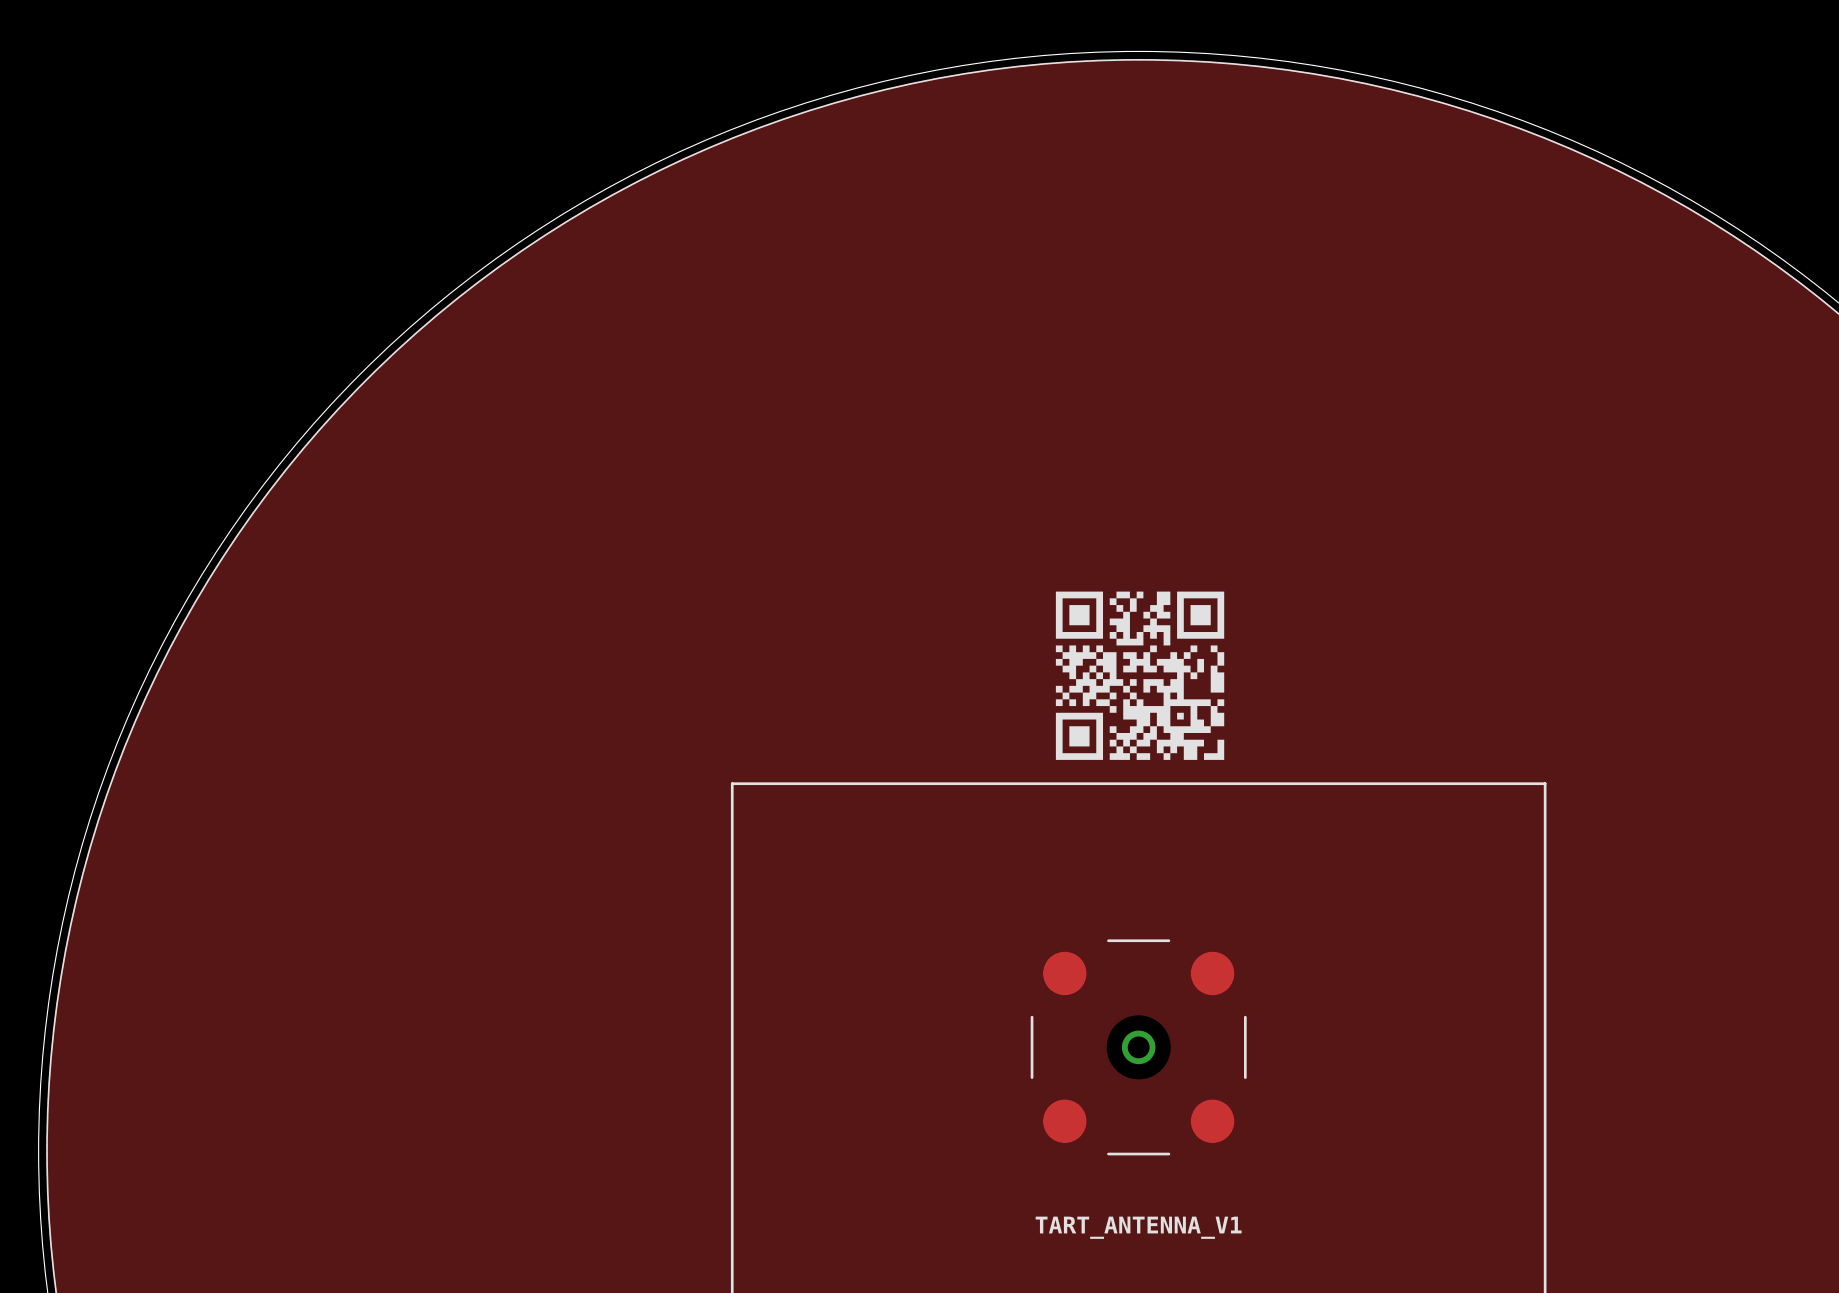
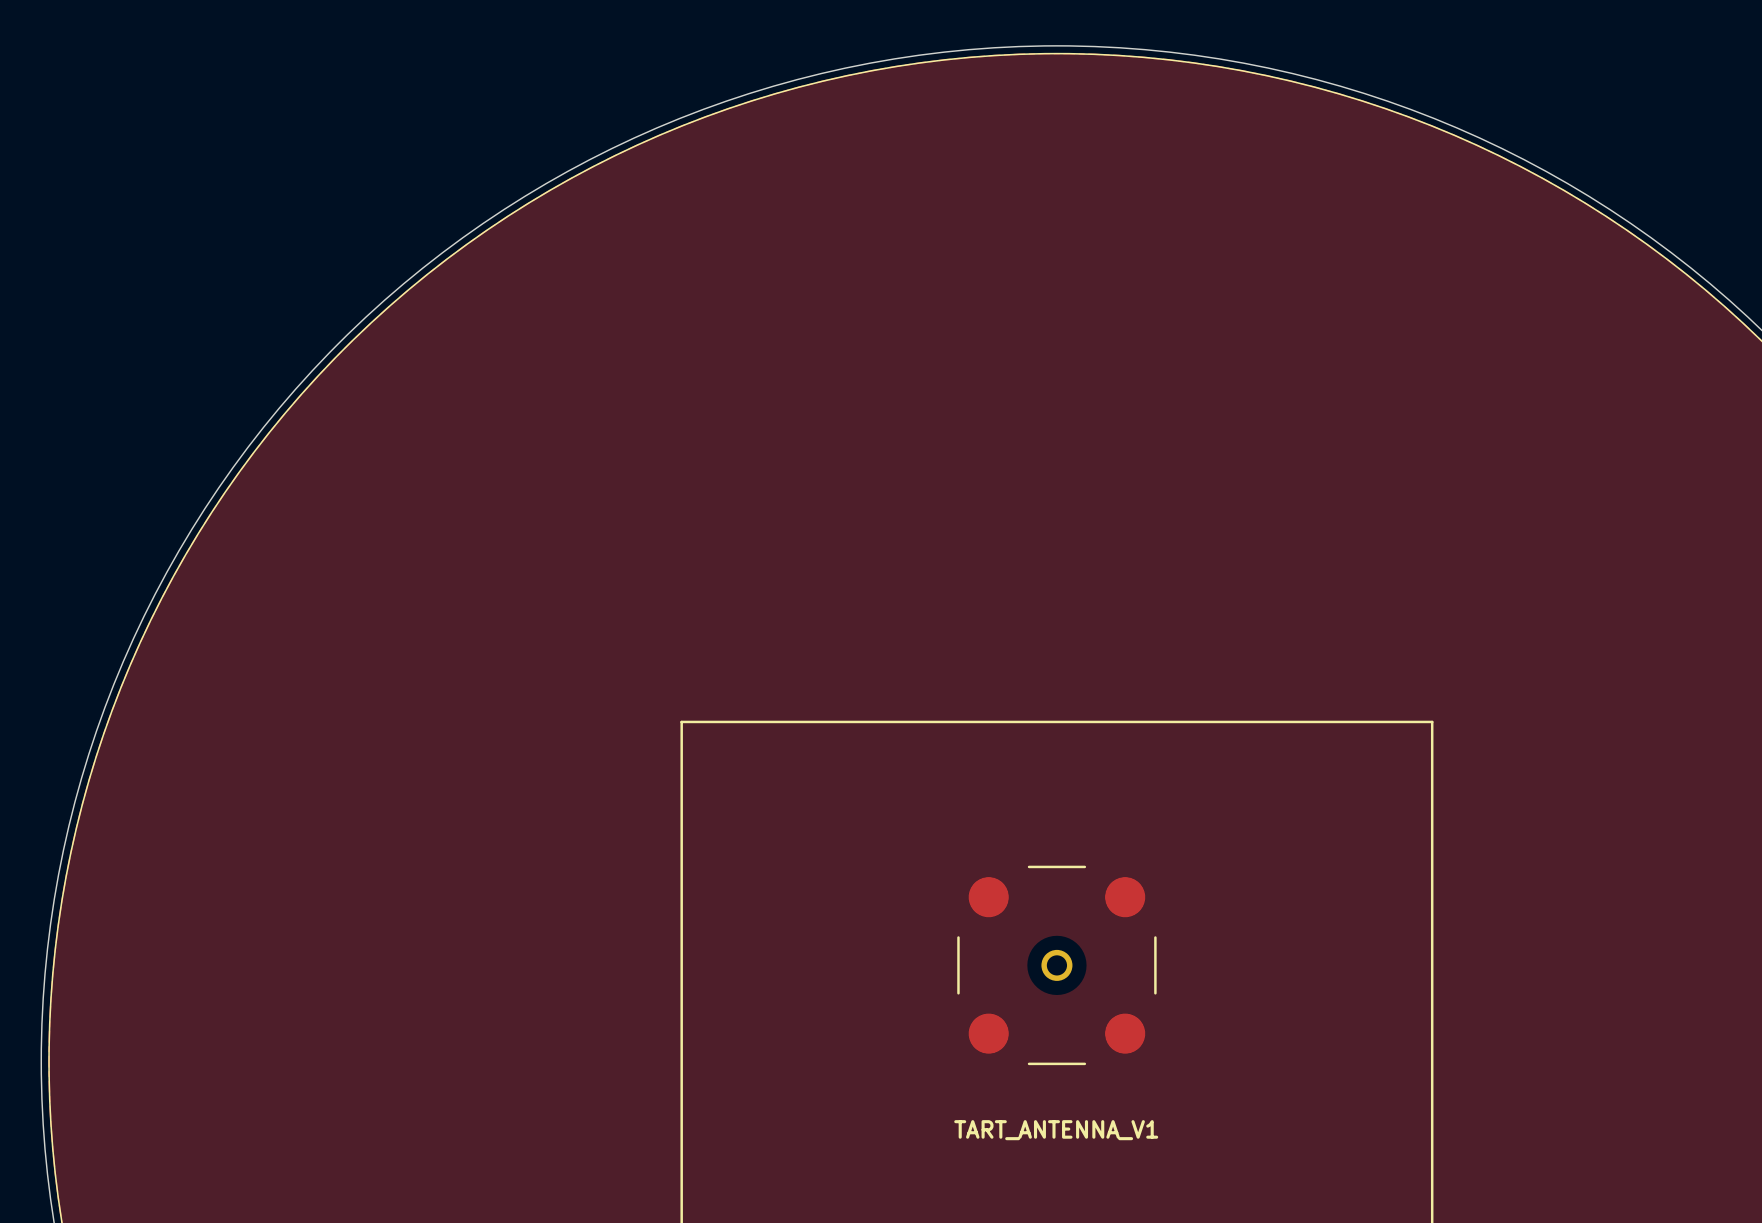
drawing: [1055, 591, 1225, 760] -> none

